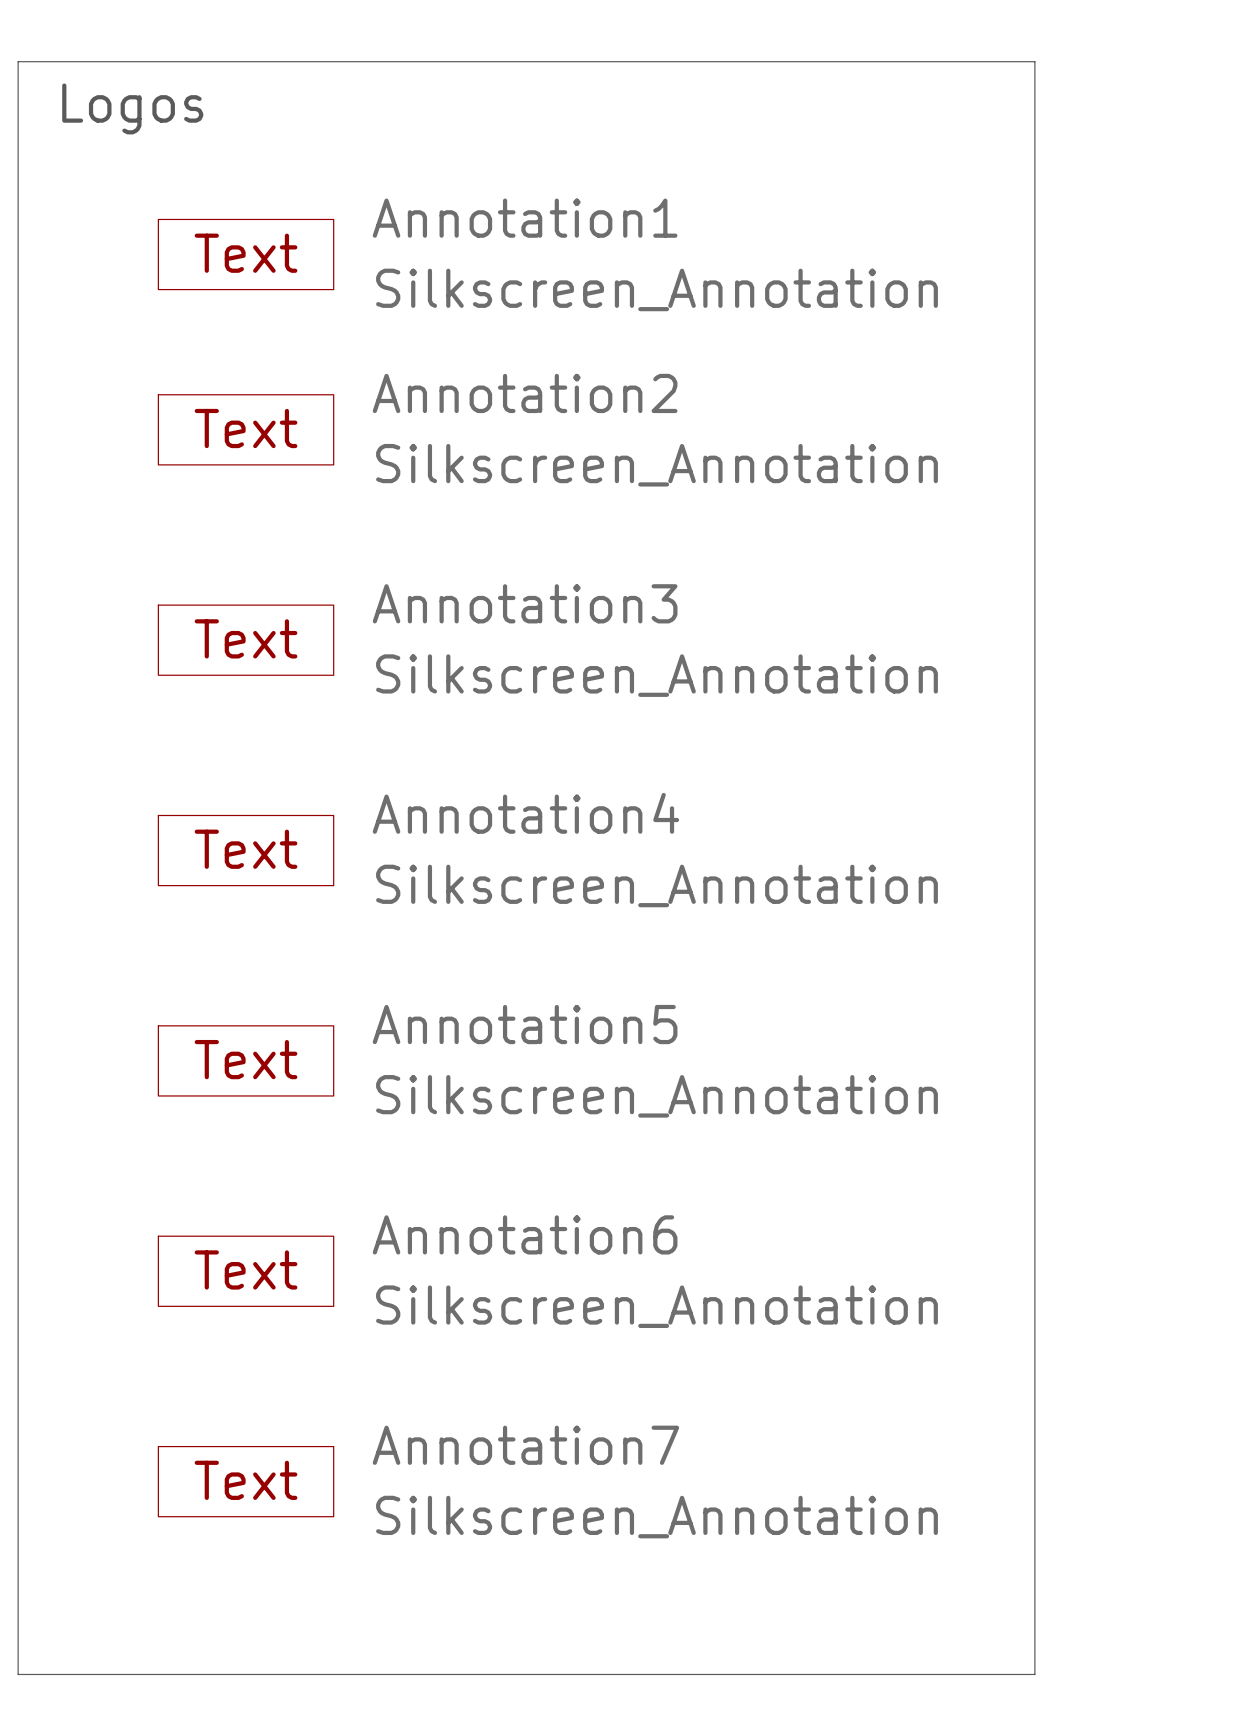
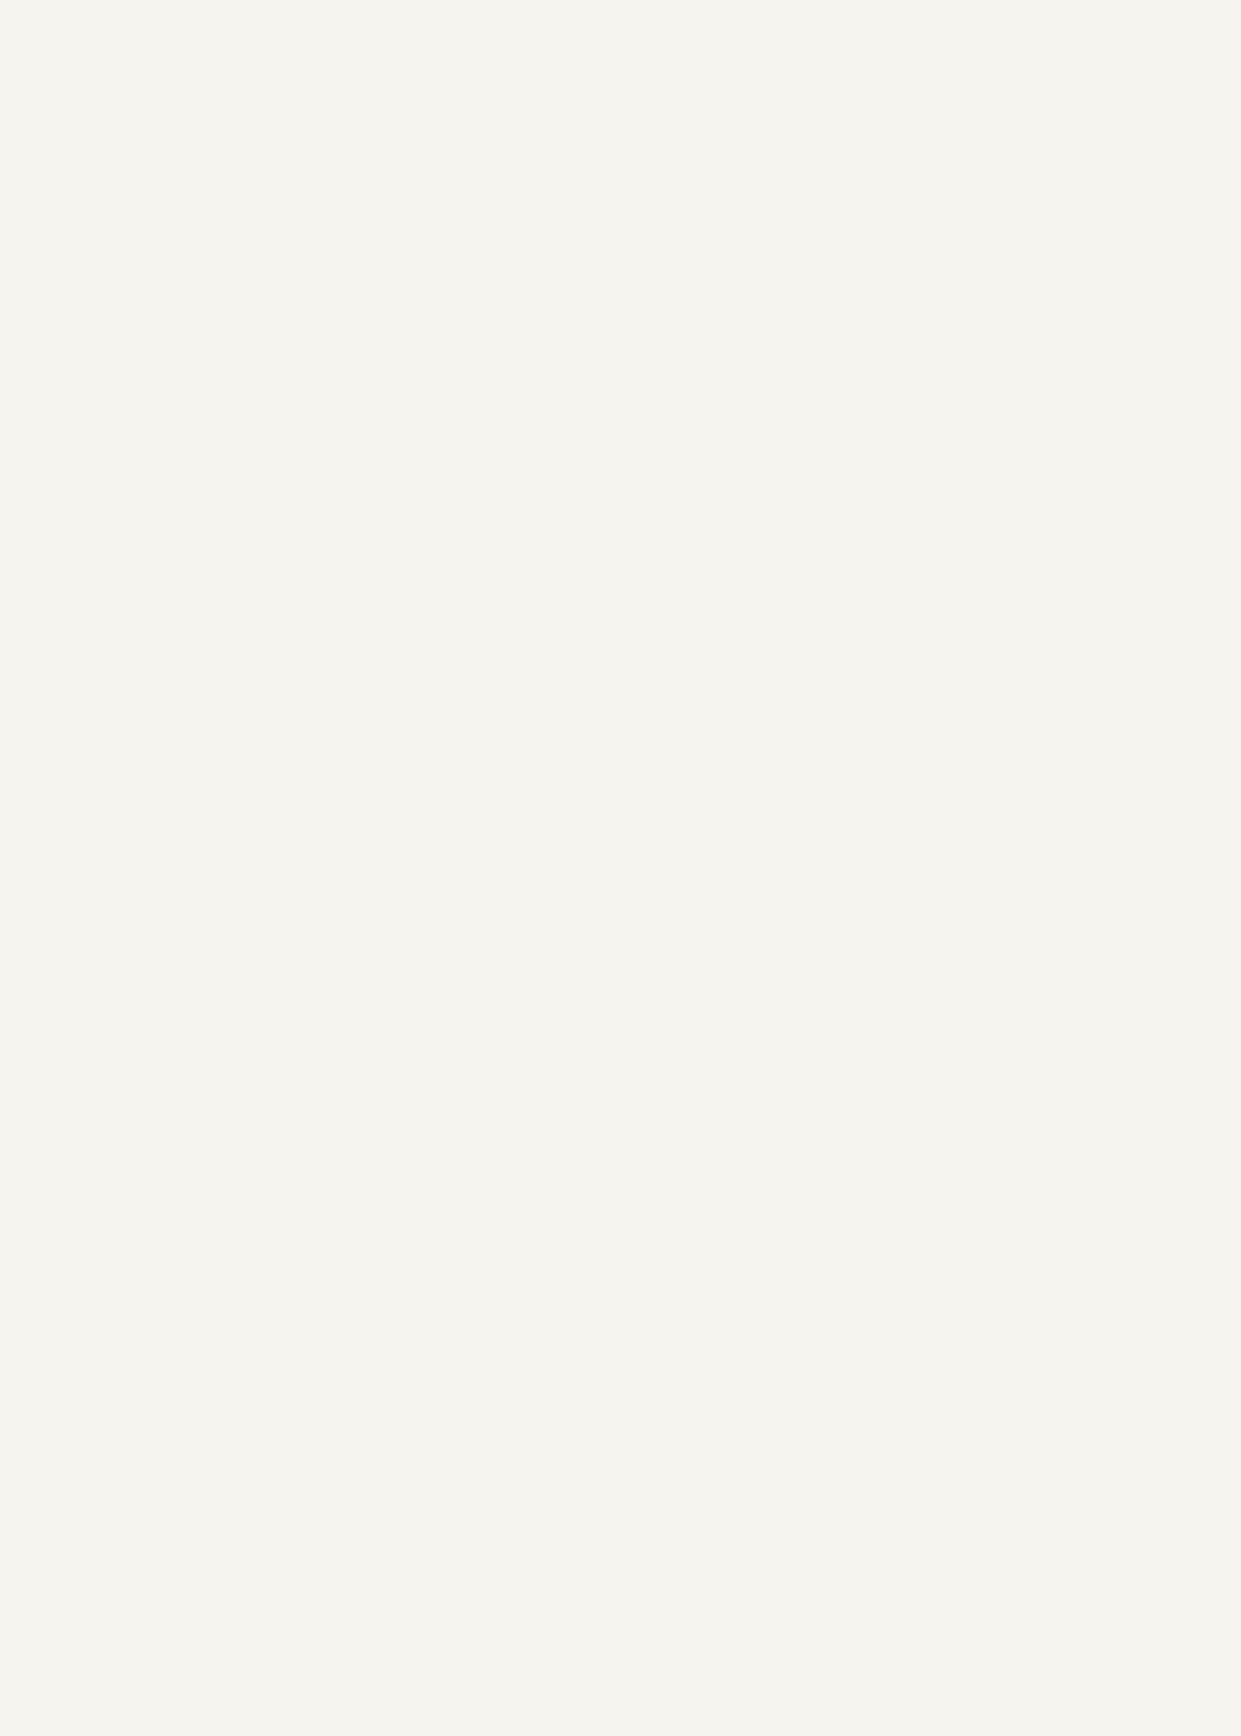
line: (18, 61) (18, 1674) (1034, 1674) (1034, 61) (18, 61) -> none
text: Logos (132, 108) -> none
Annotation1: Silkscreen_Annotation (246, 254) -> none
Annotation2: Silkscreen_Annotation (246, 429) -> none
Annotation3: Silkscreen_Annotation (246, 640) -> none
Annotation4: Silkscreen_Annotation (246, 850) -> none
Annotation5: Silkscreen_Annotation (246, 1060) -> none
Annotation6: Silkscreen_Annotation (246, 1271) -> none
Annotation7: Silkscreen_Annotation (246, 1481) -> none

